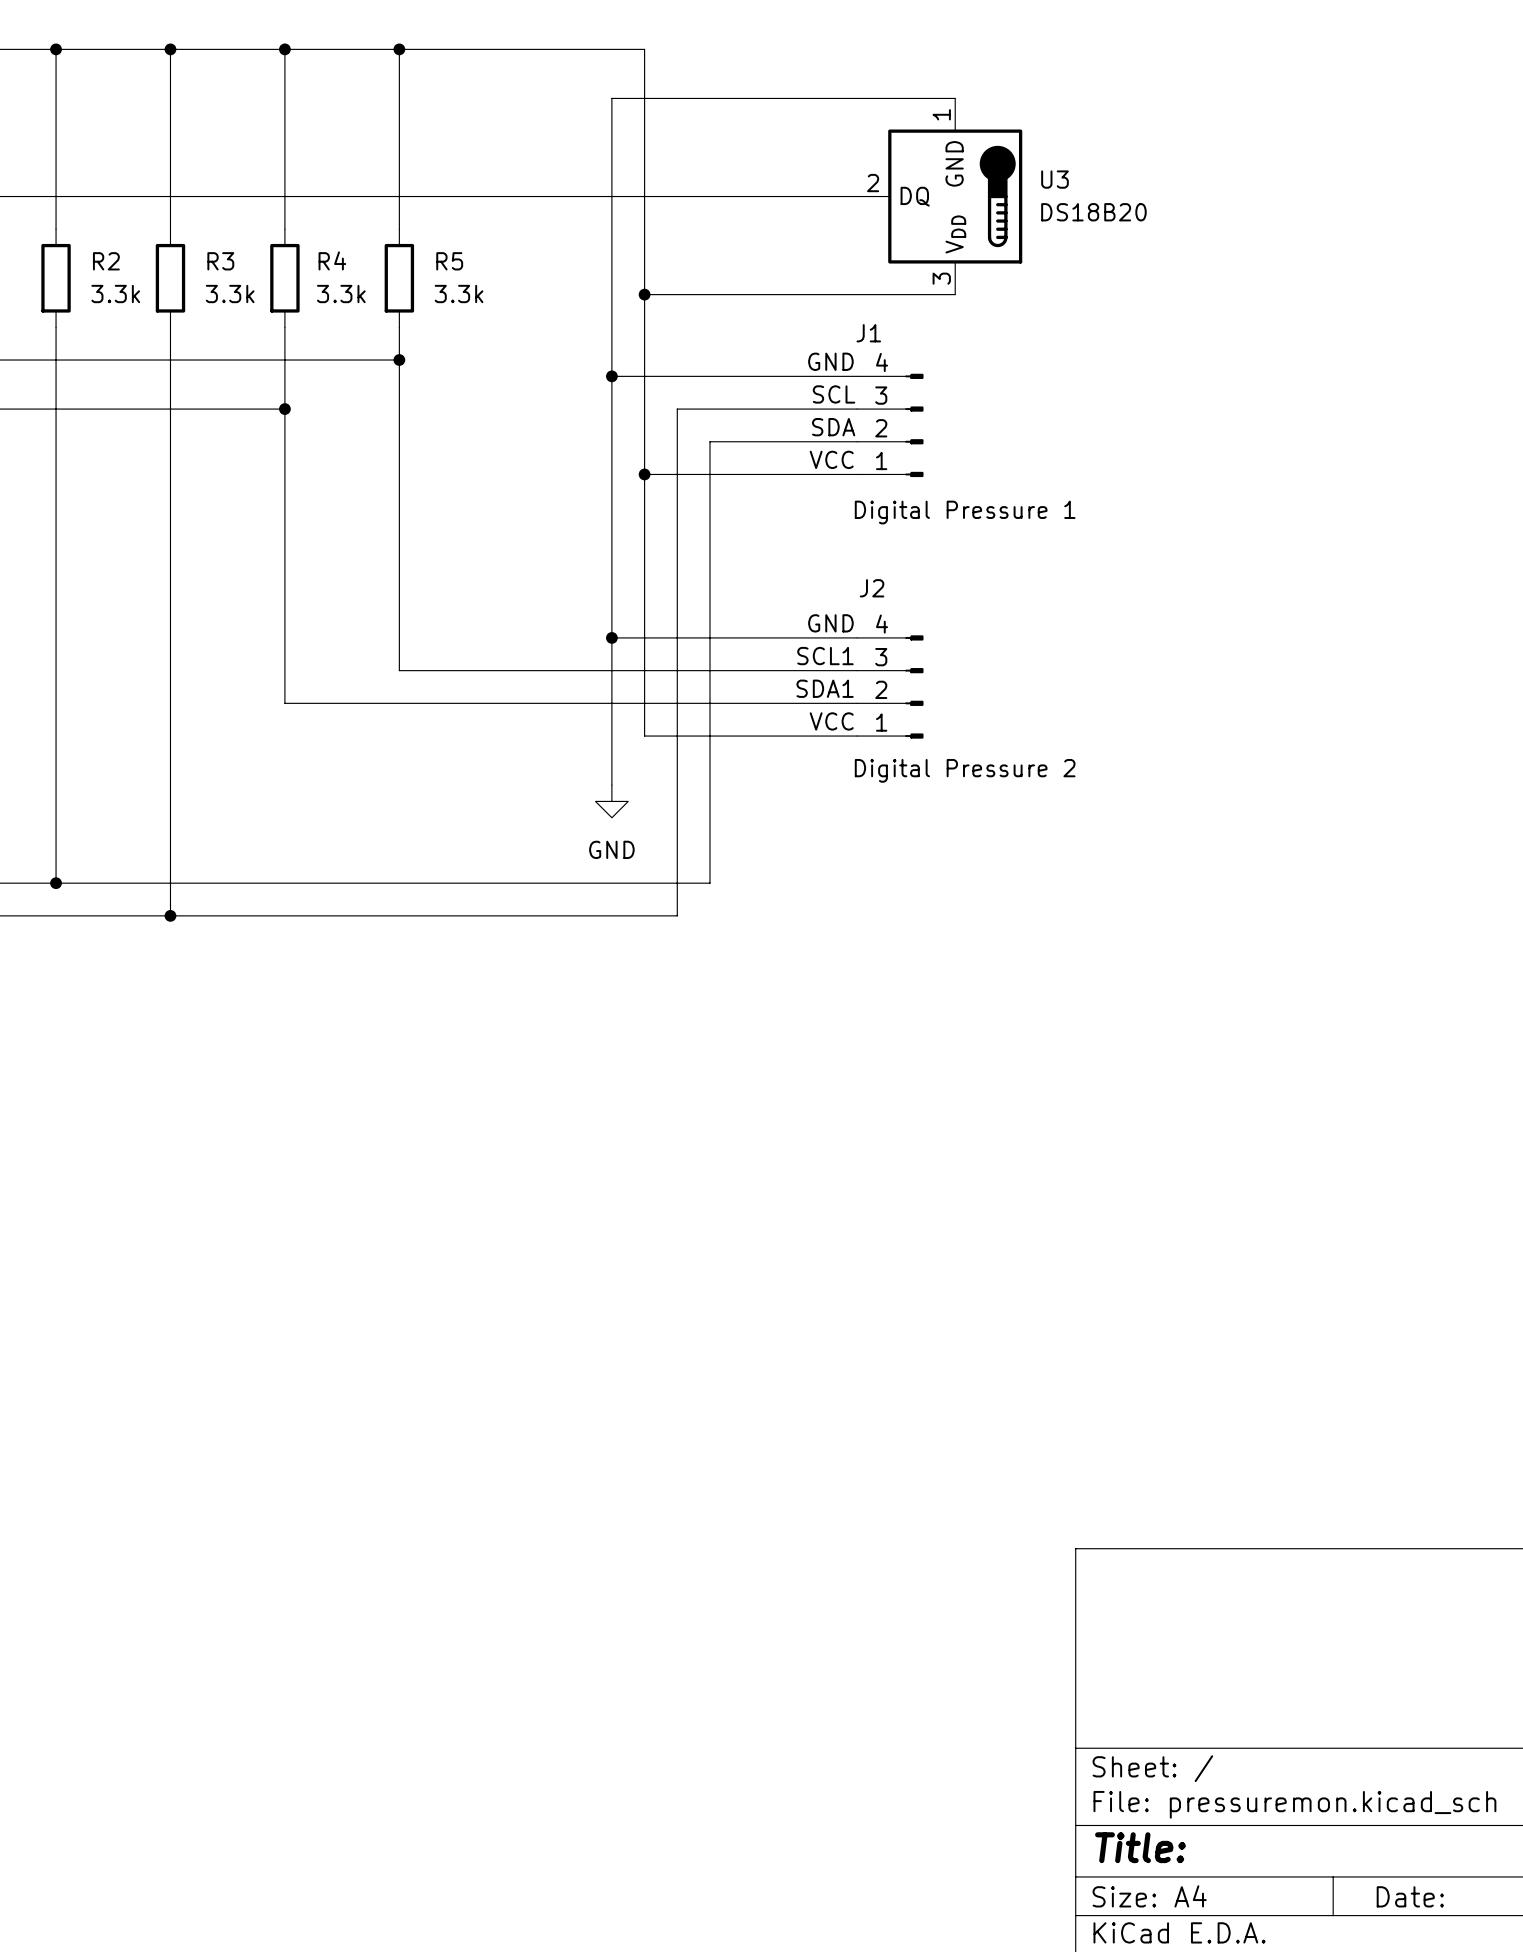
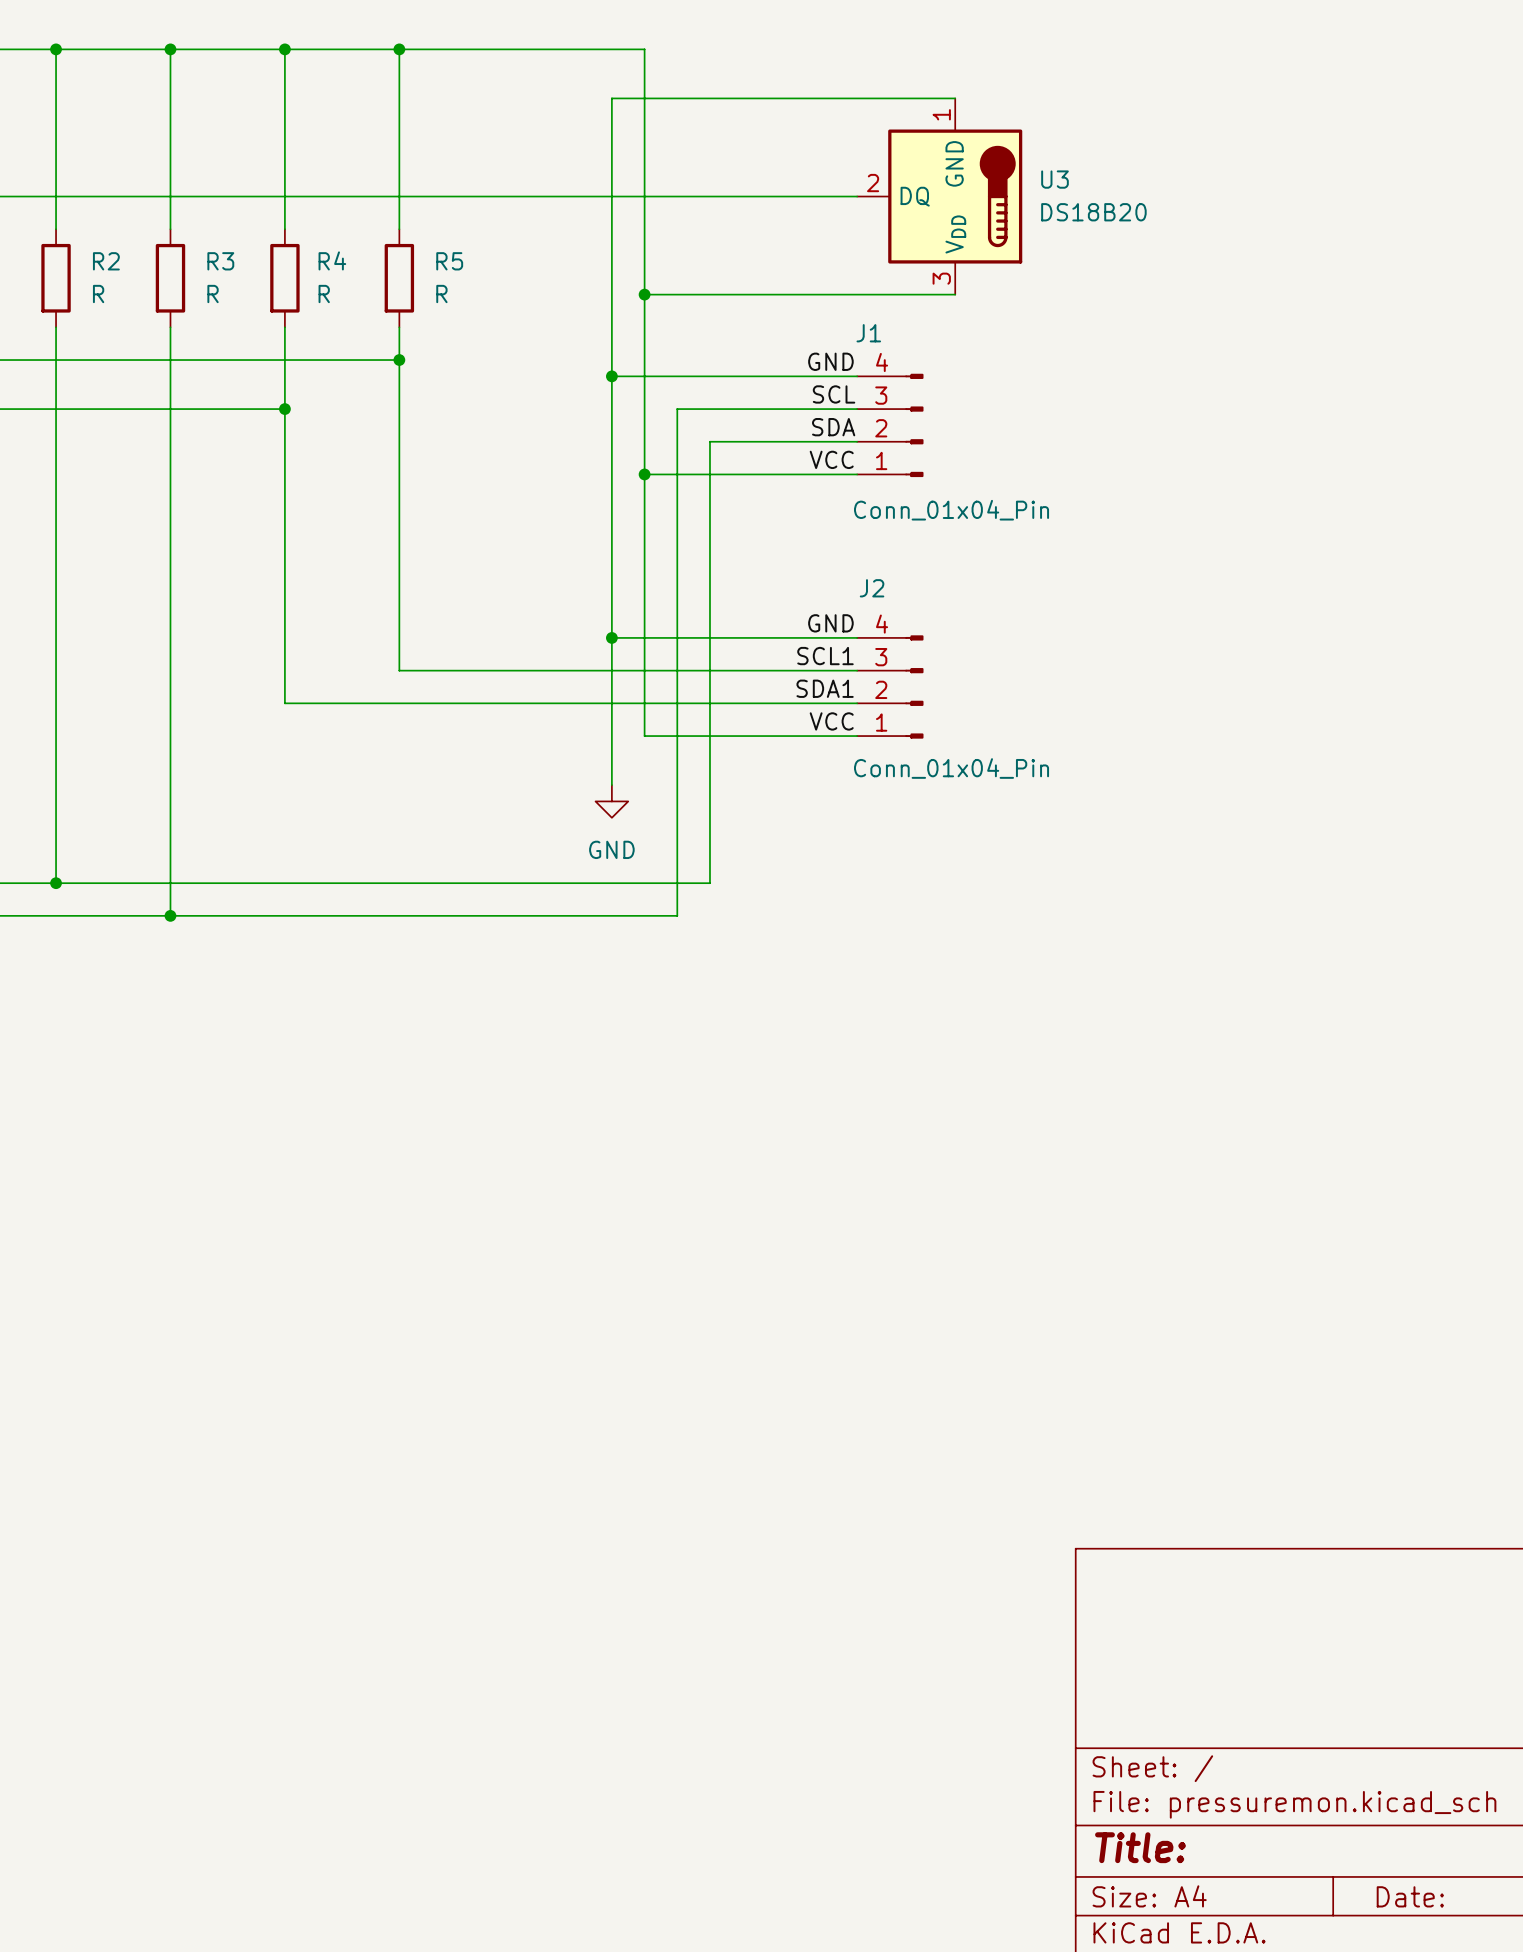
R2 value: 3.3k (115, 294) -> R (98, 294)
R3 value: 3.3k (230, 294) -> R (213, 294)
R4 value: 3.3k (341, 294) -> R (324, 294)
R5 value: 3.3k (459, 294) -> R (441, 294)
J1 value: Digital Pressure 1 (965, 512) -> Conn_01x04_Pin (951, 510)
J2 value: Digital Pressure 2 (965, 770) -> Conn_01x04_Pin (951, 768)

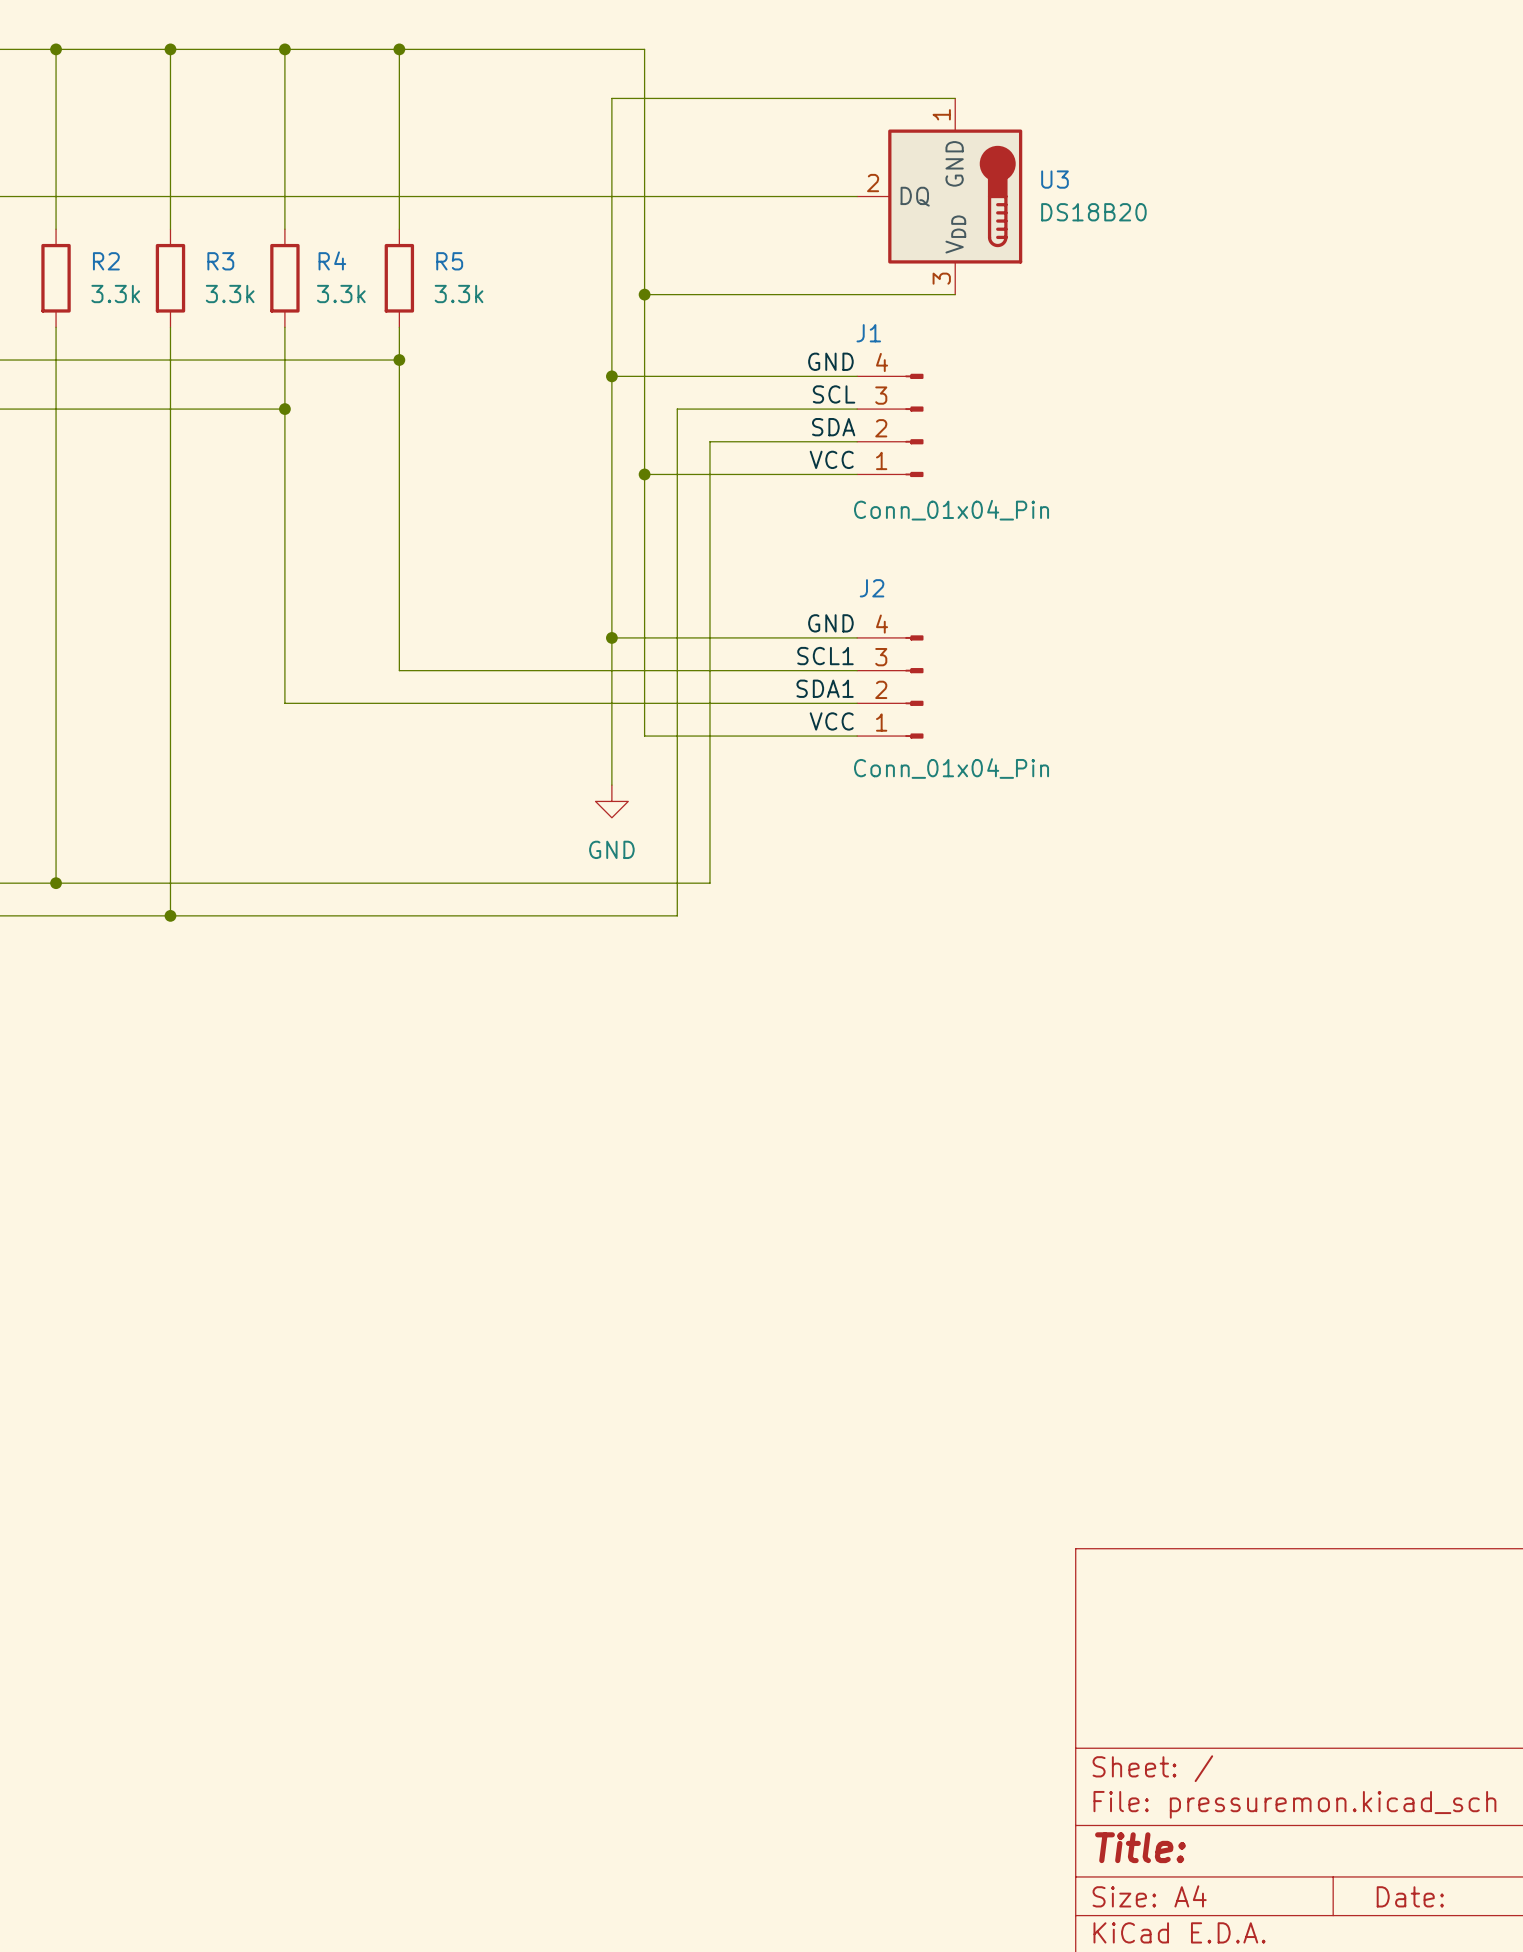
R2 value: R (98, 294) -> 3.3k (115, 294)
R3 value: R (213, 294) -> 3.3k (230, 294)
R4 value: R (324, 294) -> 3.3k (341, 294)
R5 value: R (441, 294) -> 3.3k (459, 294)

